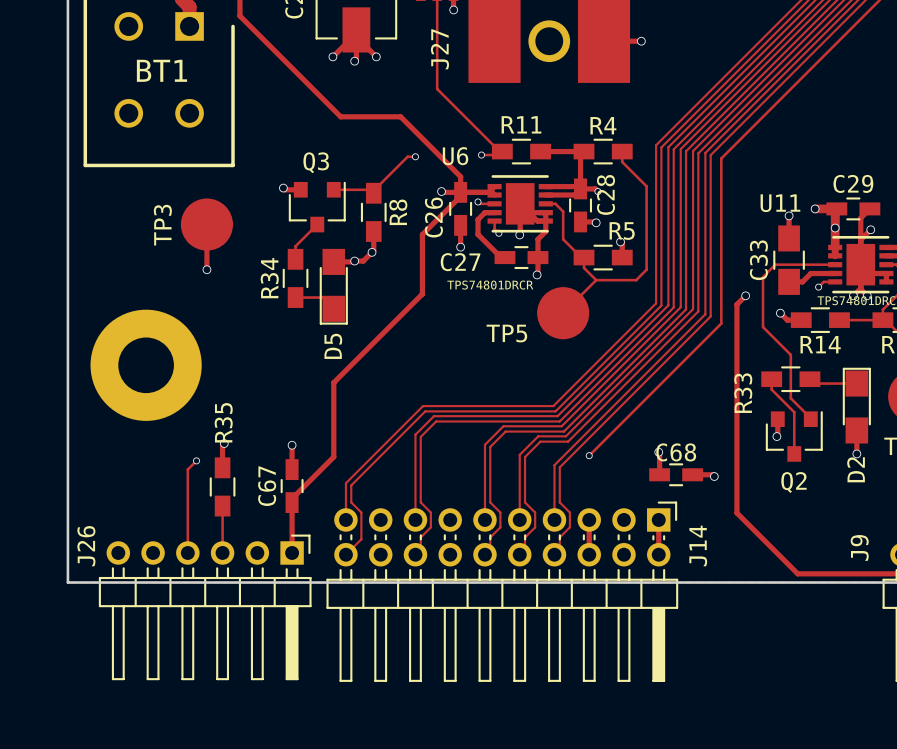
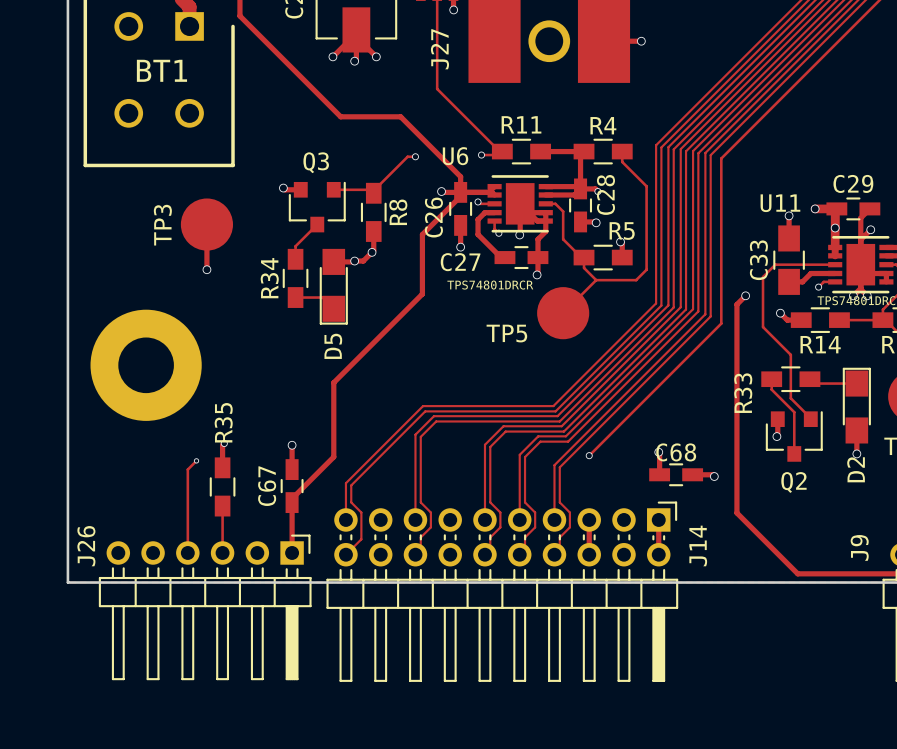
via: (224, 443) -> none
via position: (196, 460) -> (224, 443)
via: none -> (196, 460)

